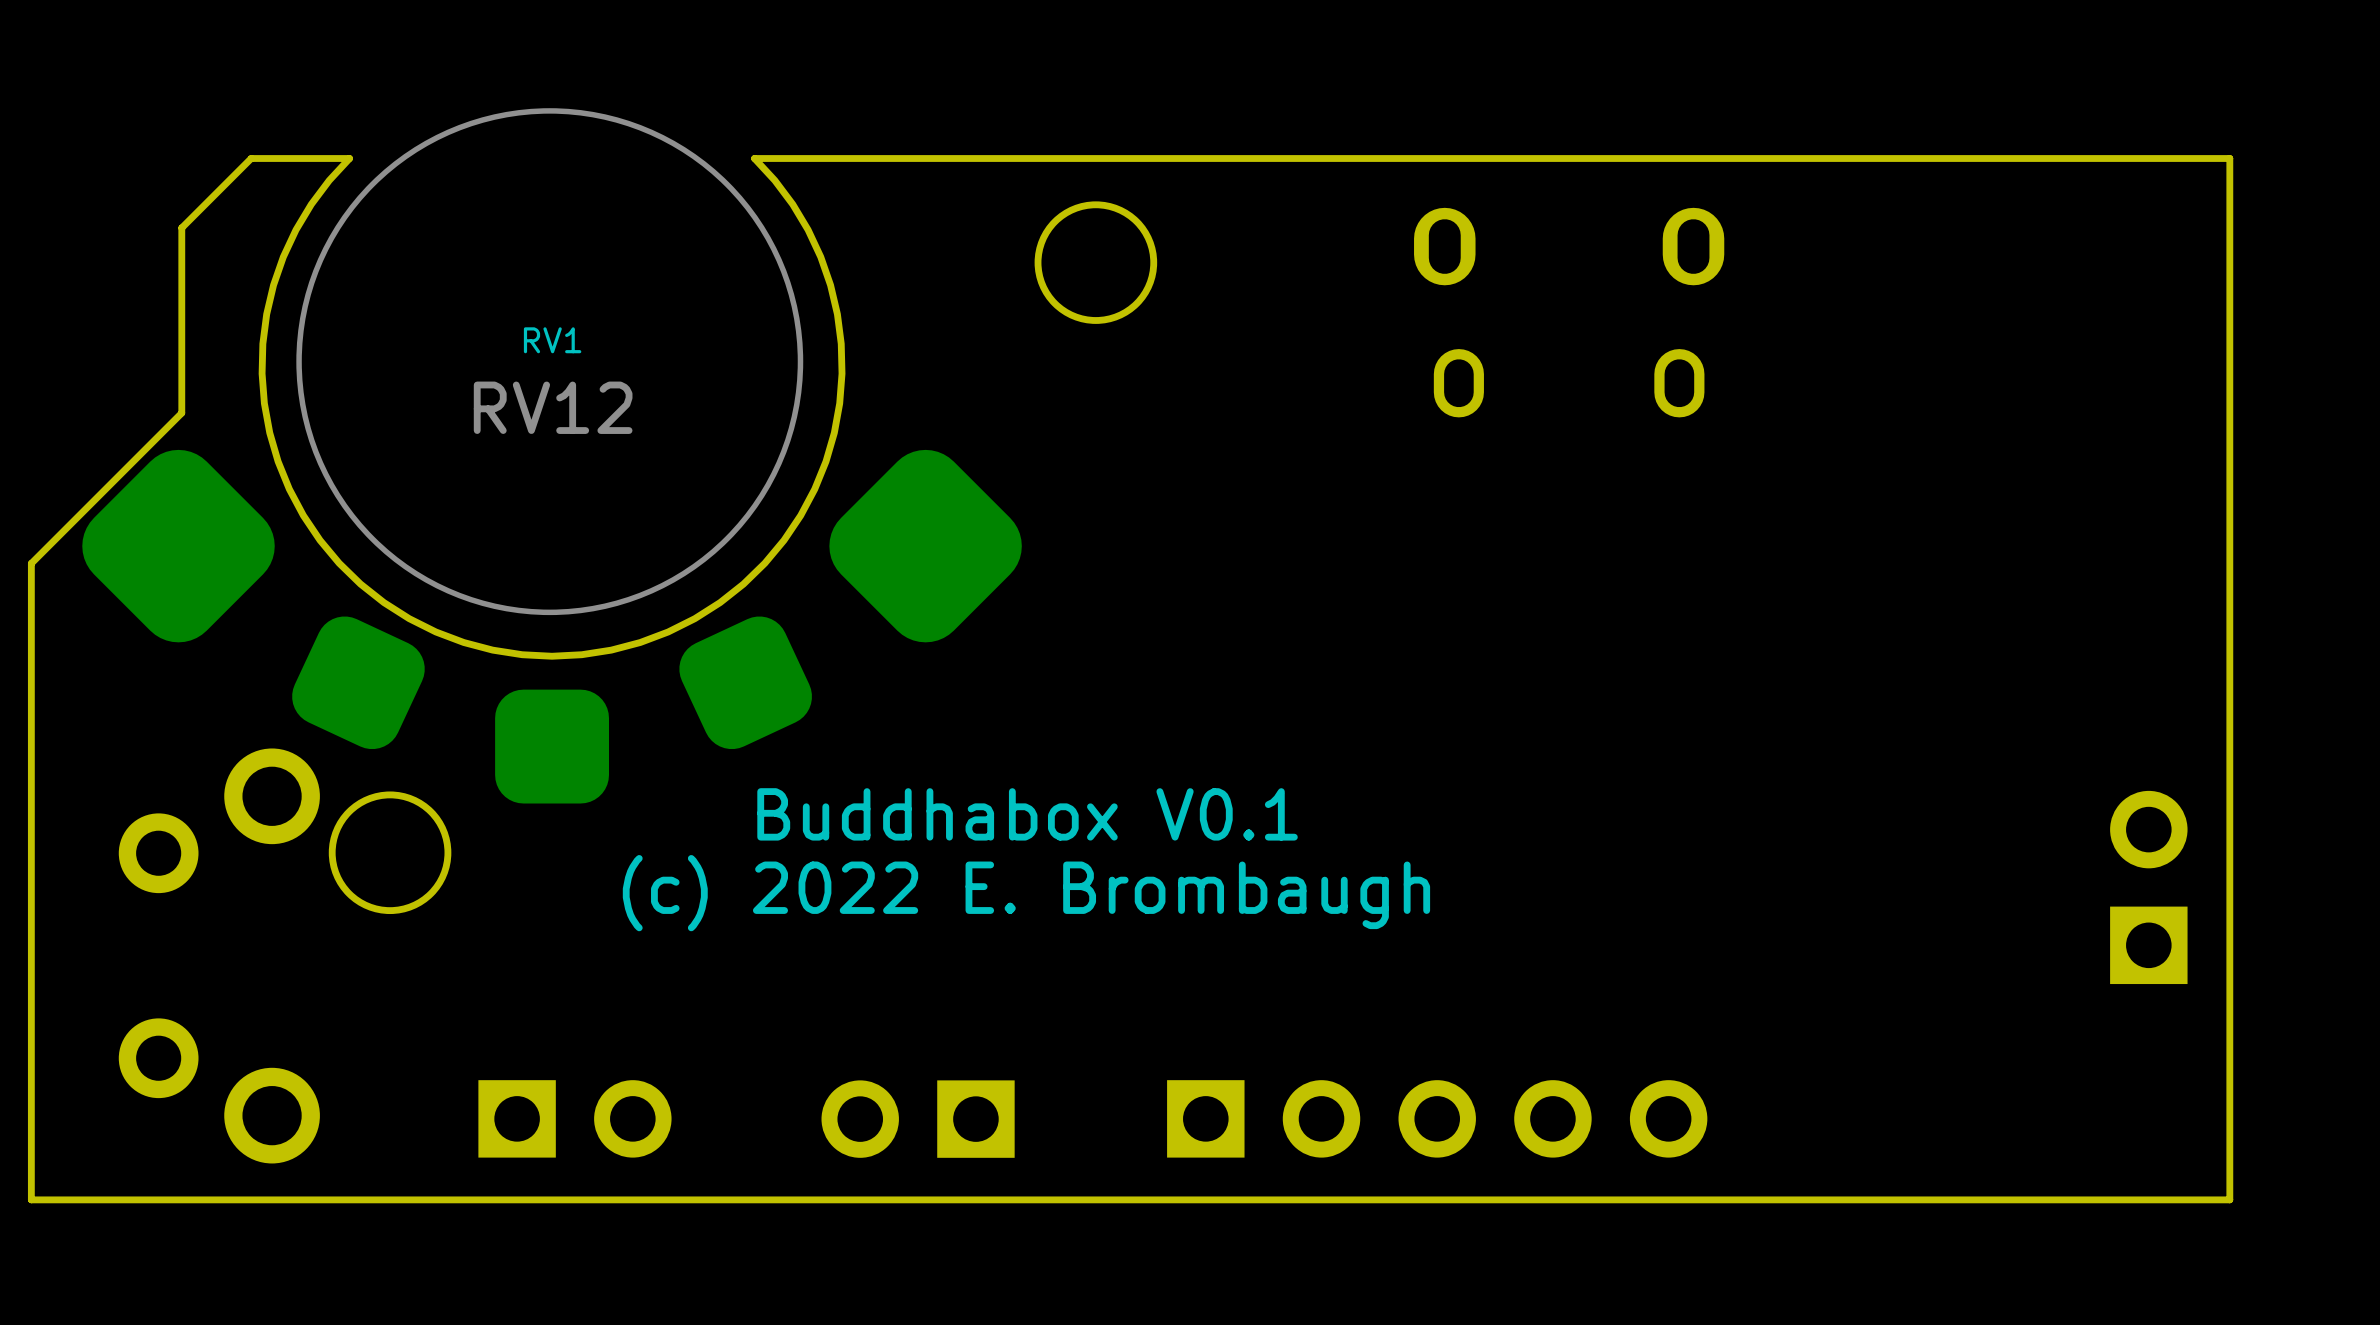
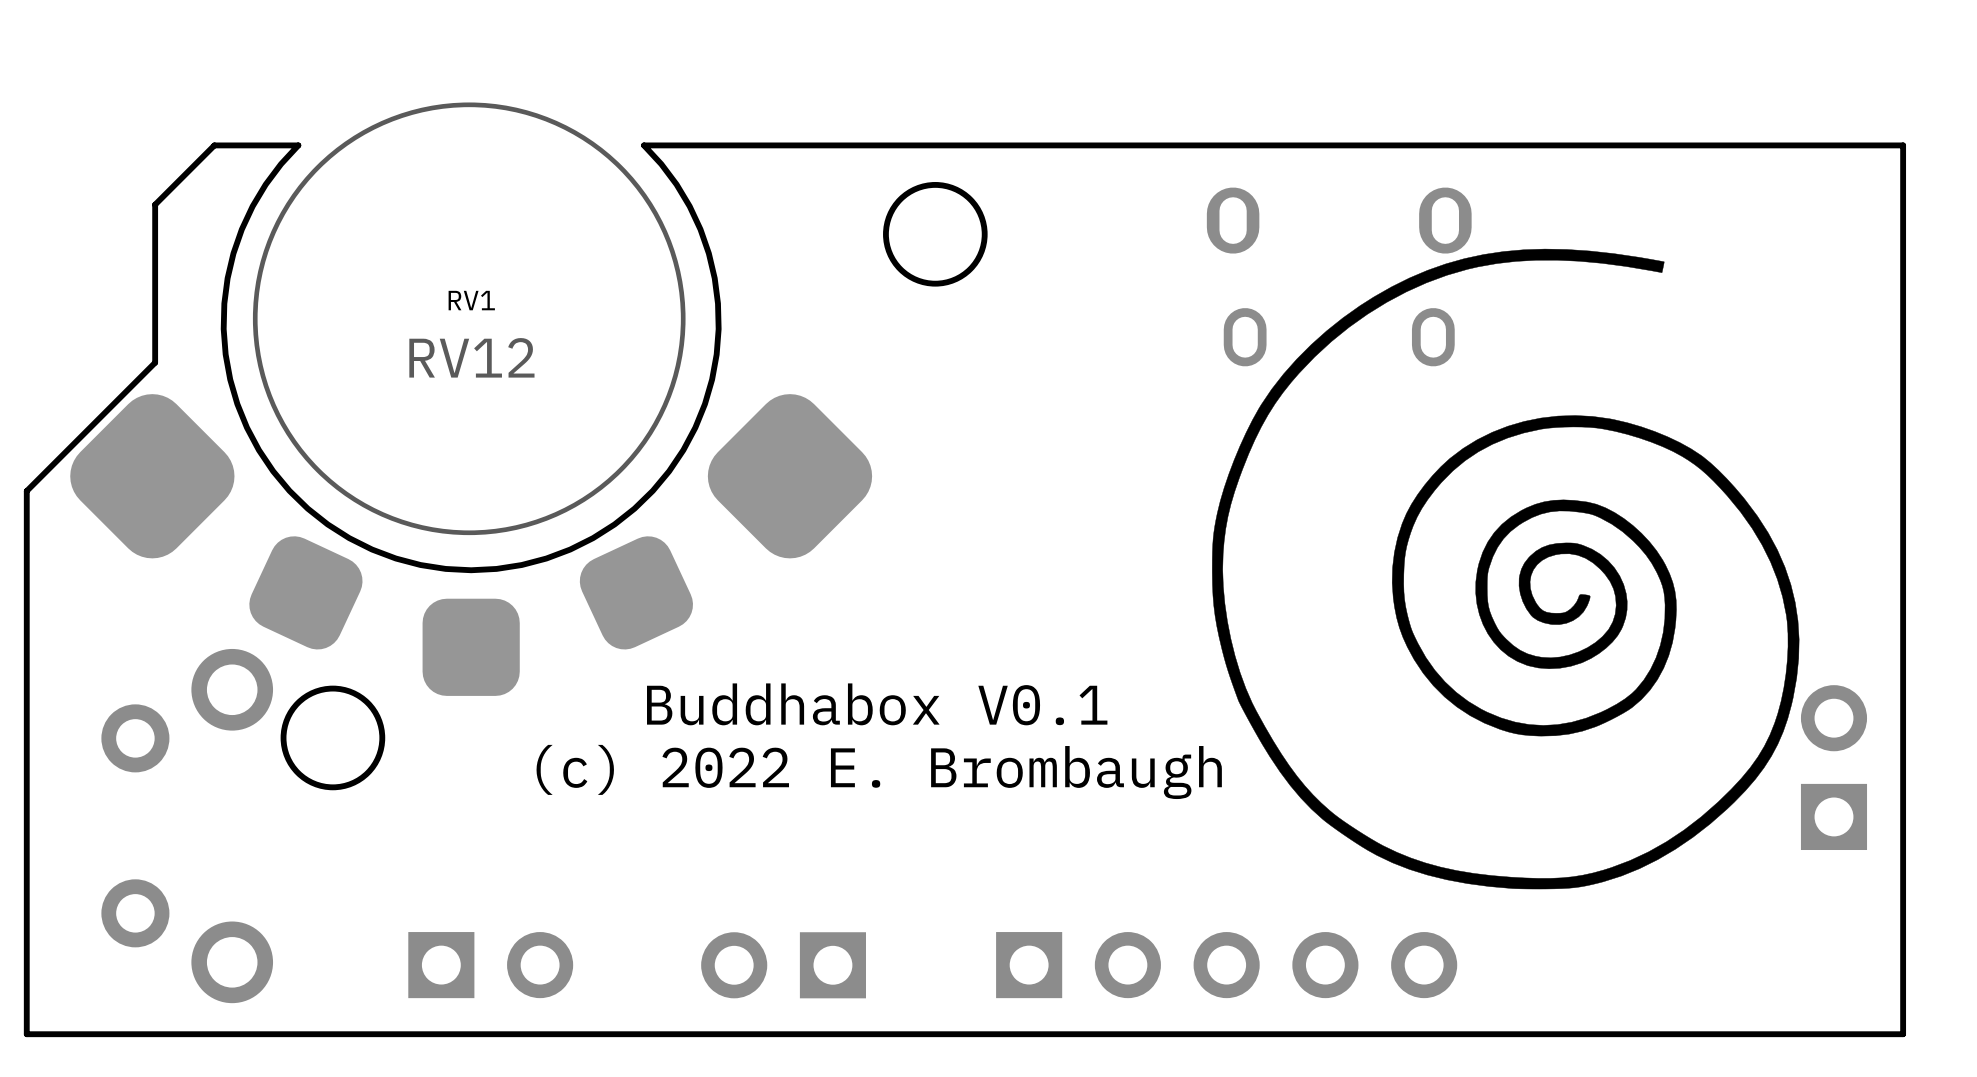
drawing: none -> [1212, 248, 1800, 890]

